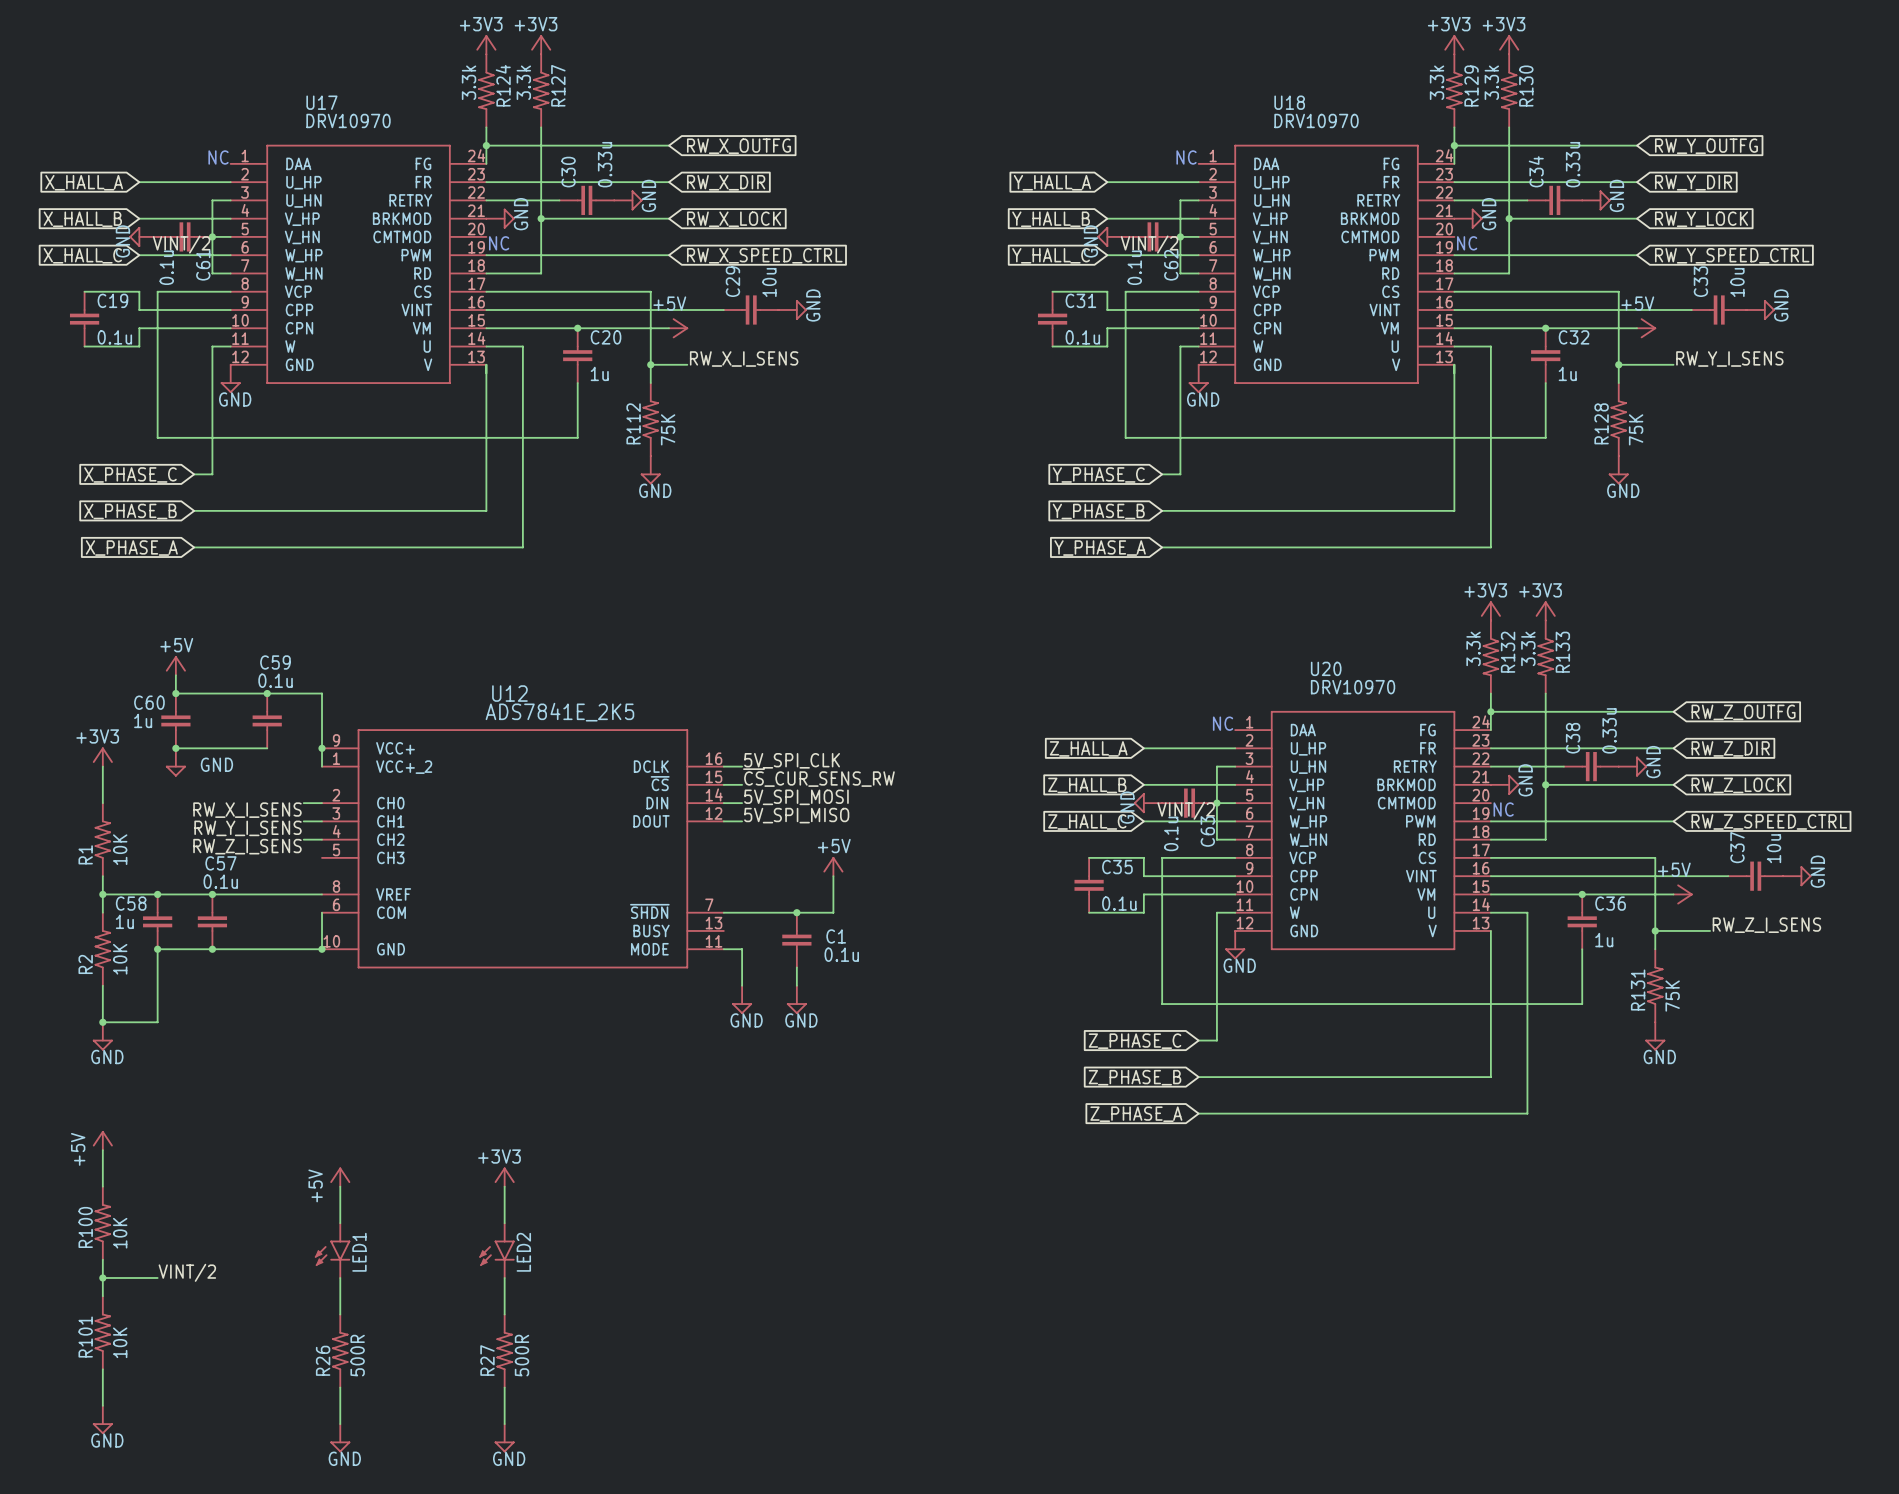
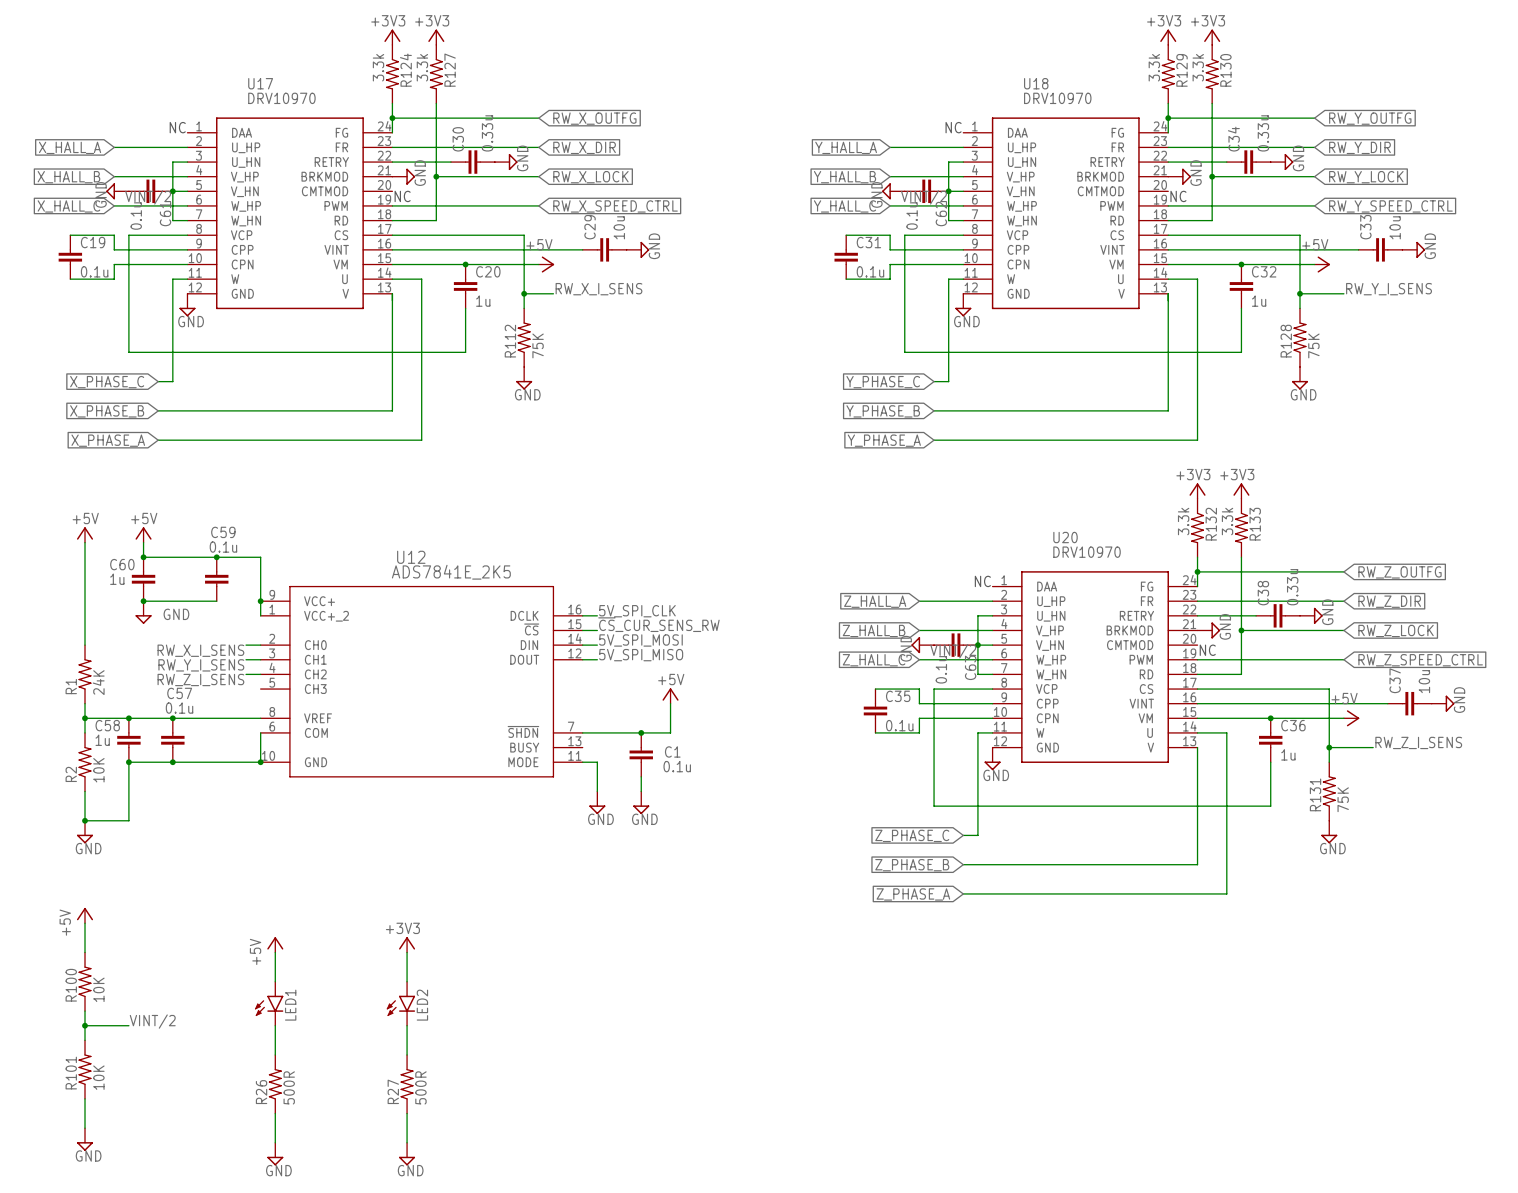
power symbol: none -> +5V (85, 534)
wire: none -> (85, 542) (85, 615)
power symbol: +3V3 (102, 757) -> none
R1 value: 10K (120, 849) -> 24K (98, 682)

